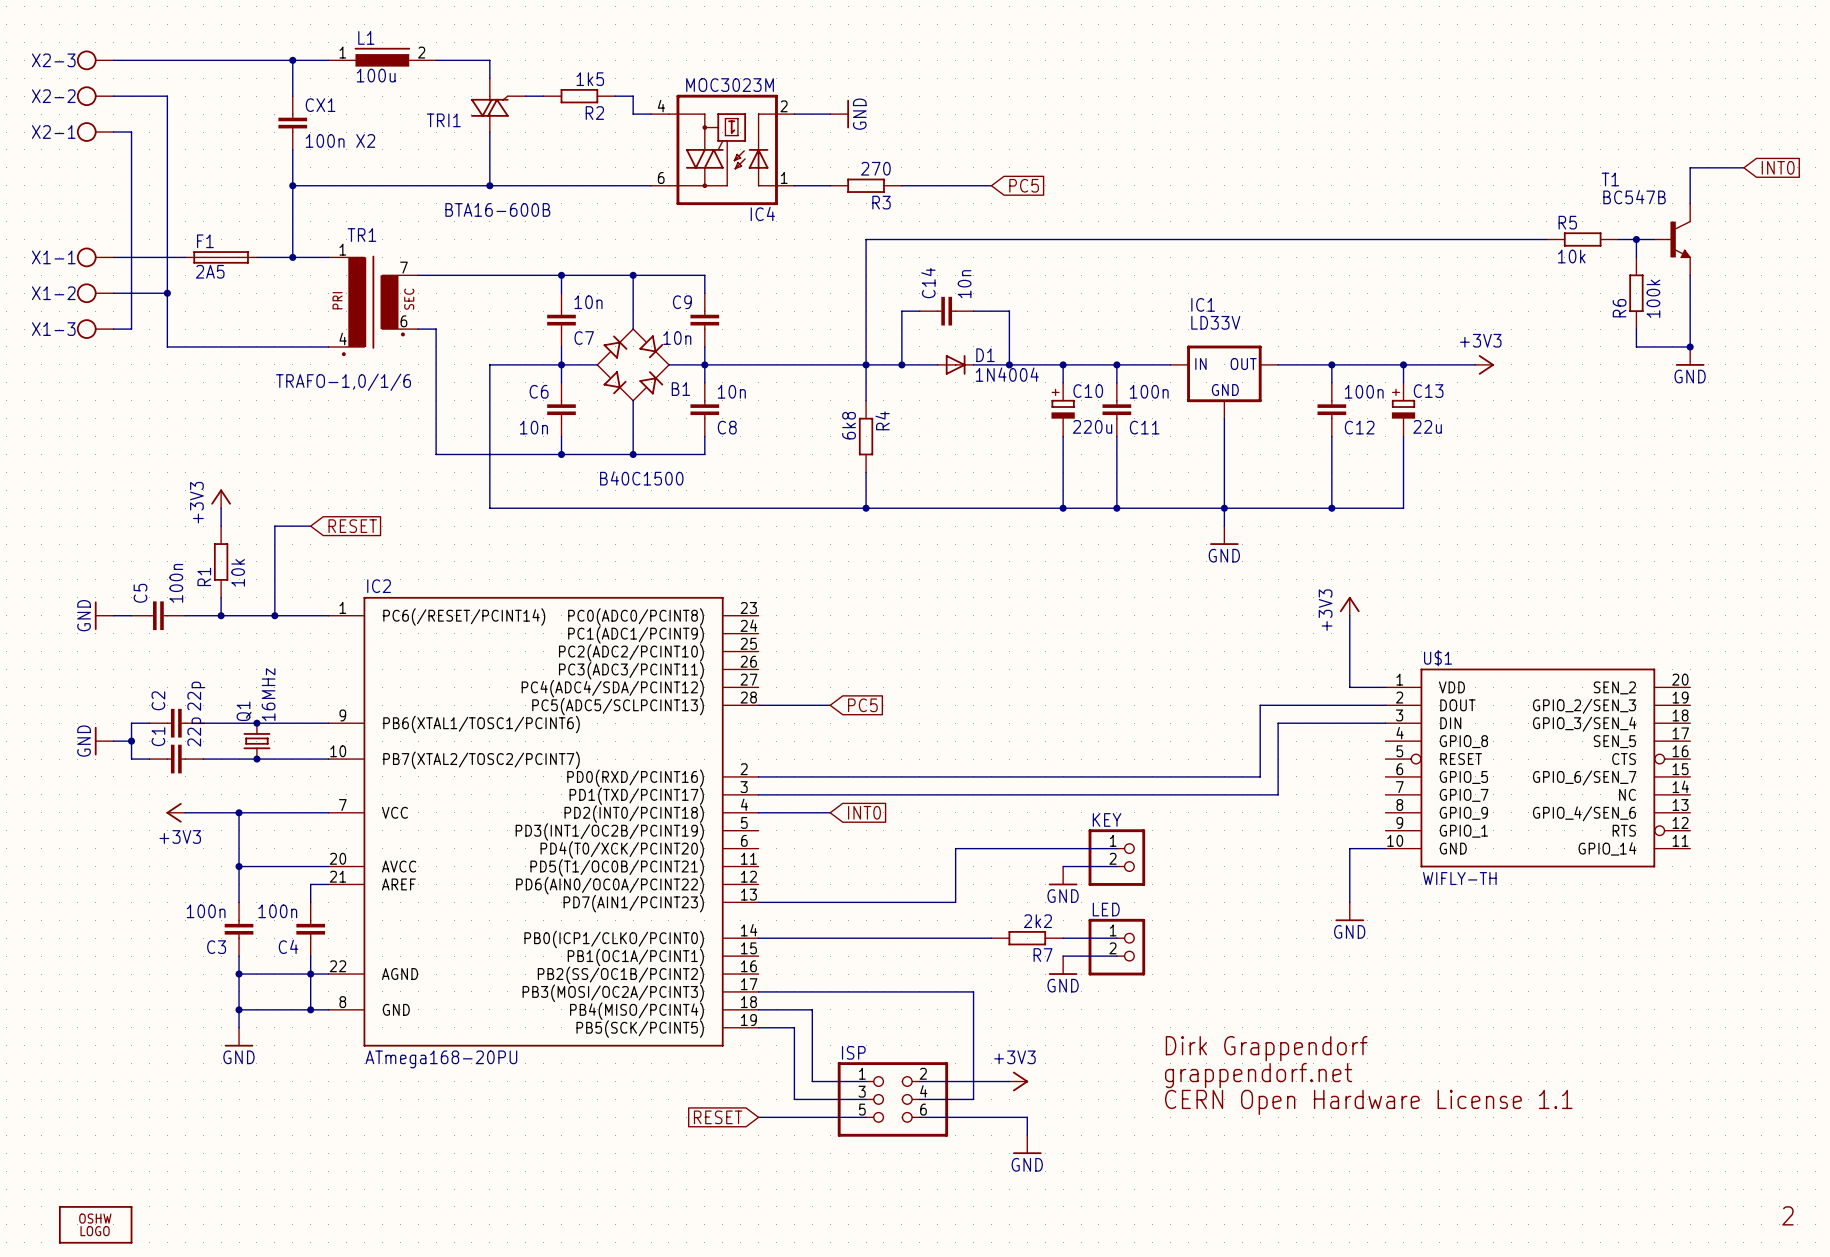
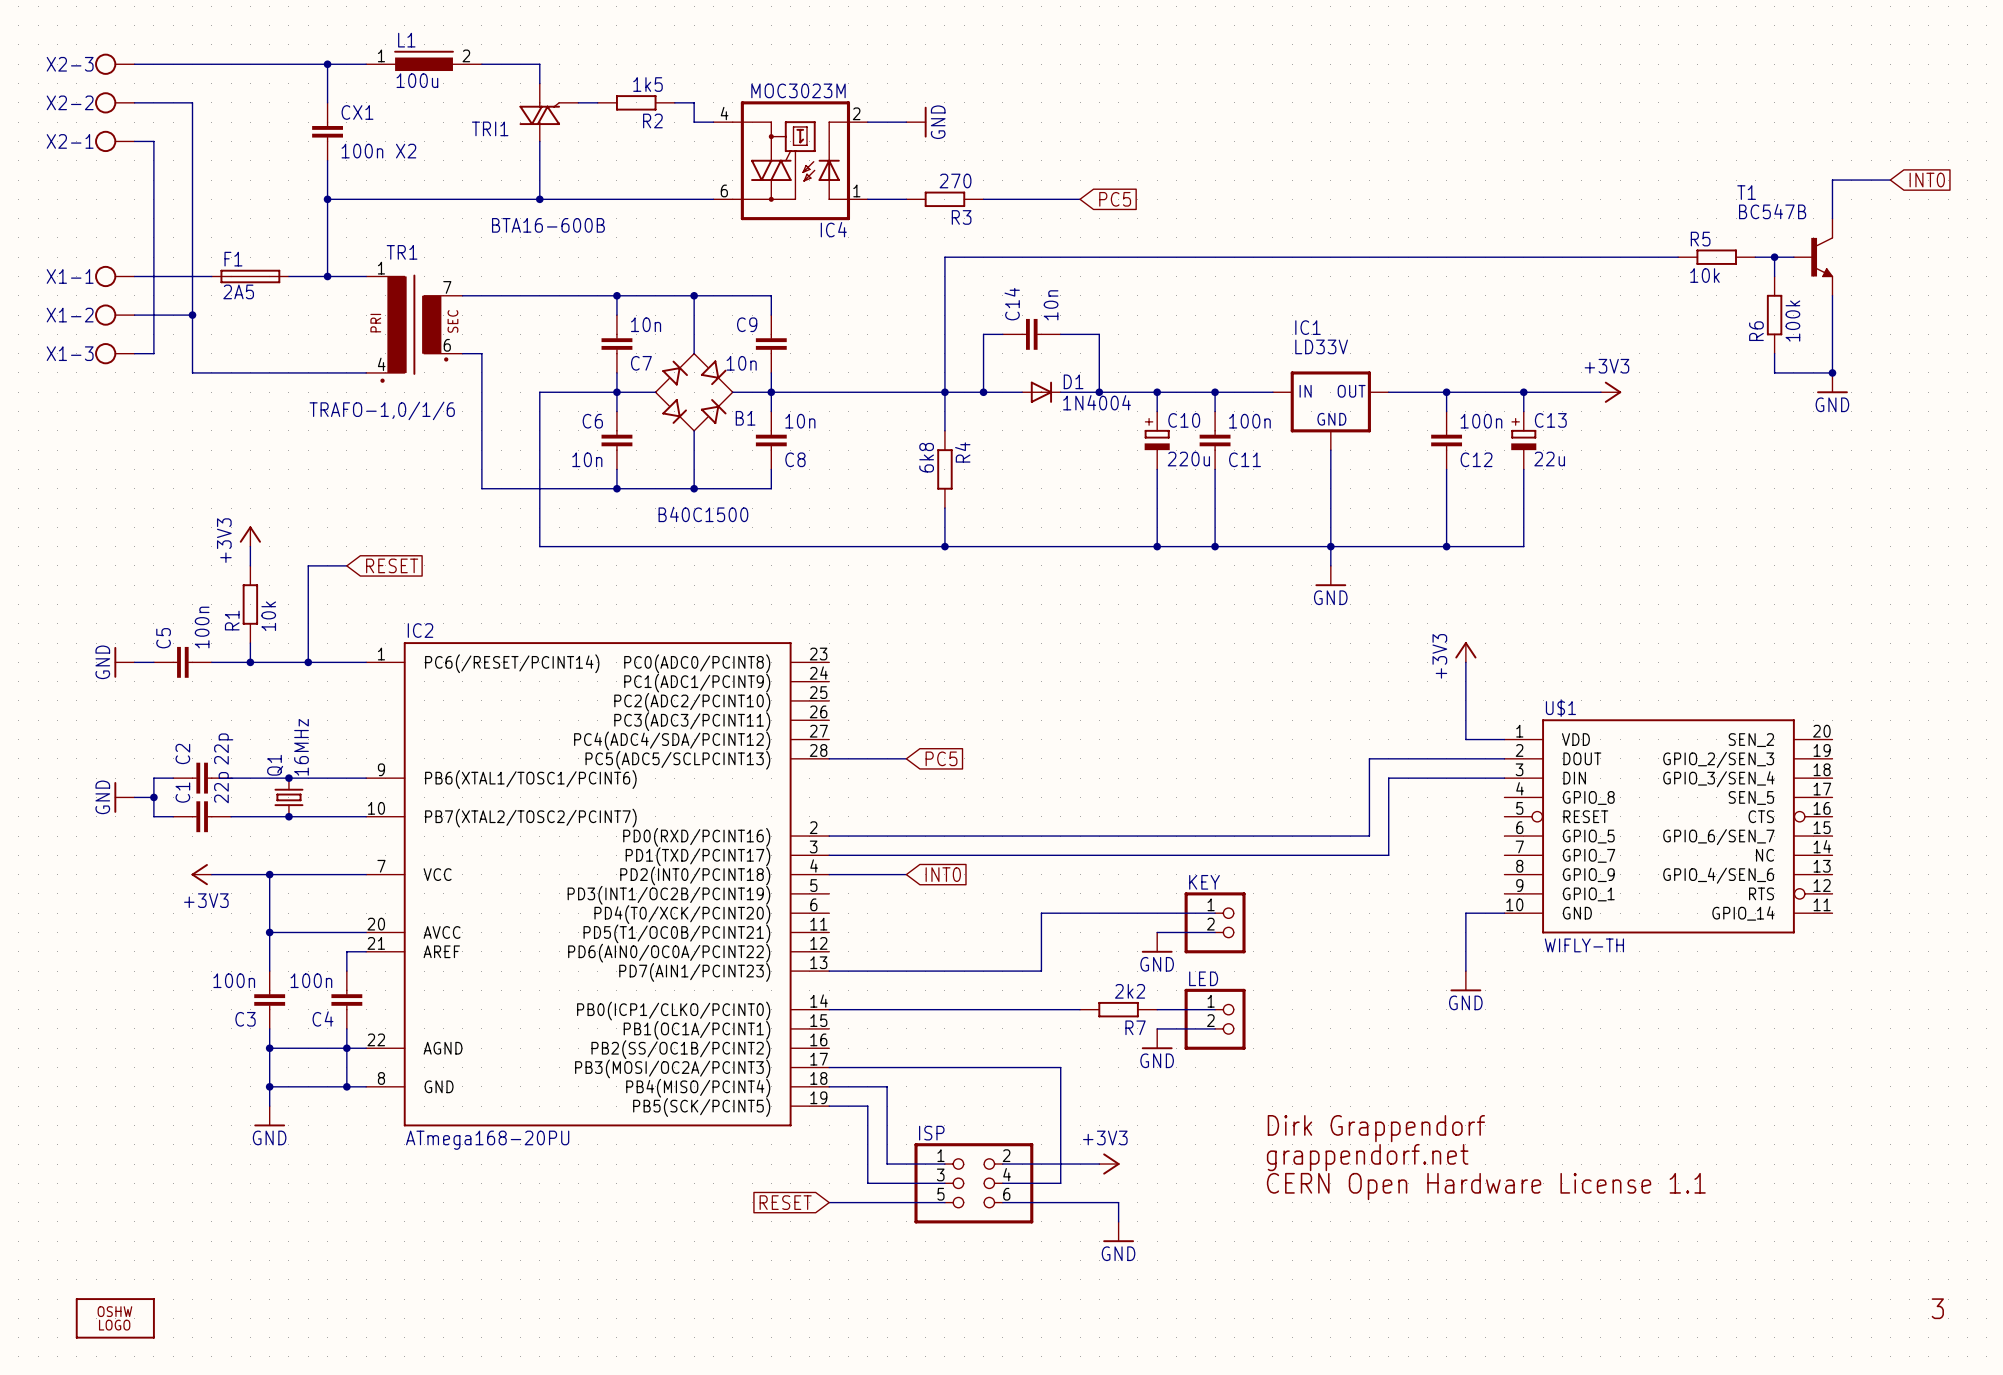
text: 2 (1787, 1215) -> 3 (1937, 1308)

